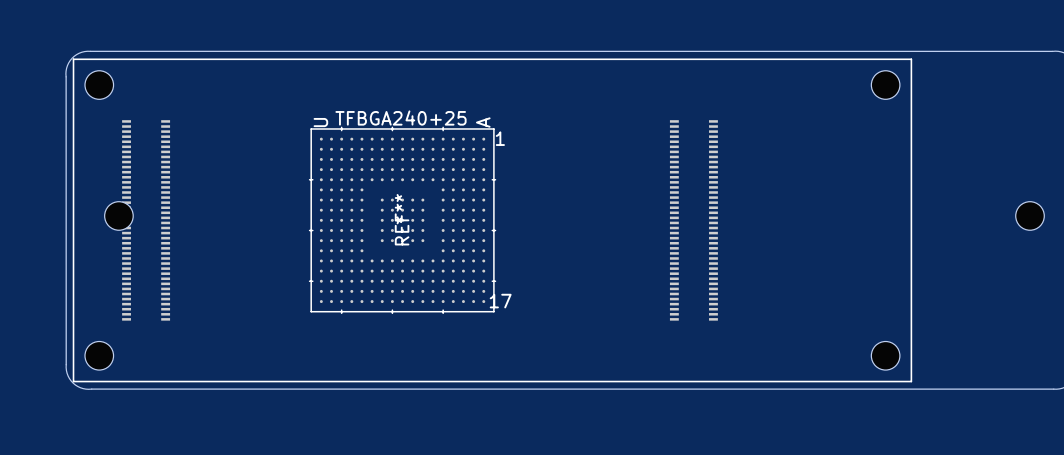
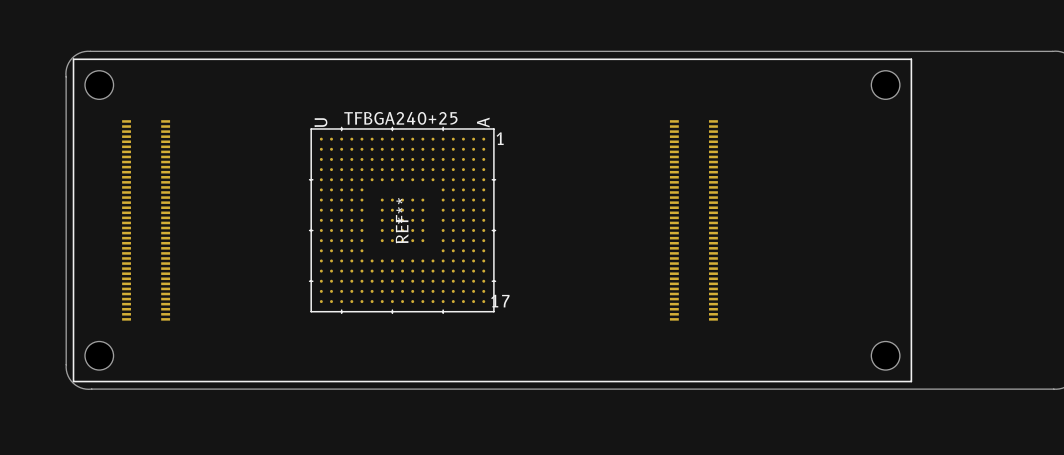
part: (118, 215) -> none
part: (1030, 215) -> none

